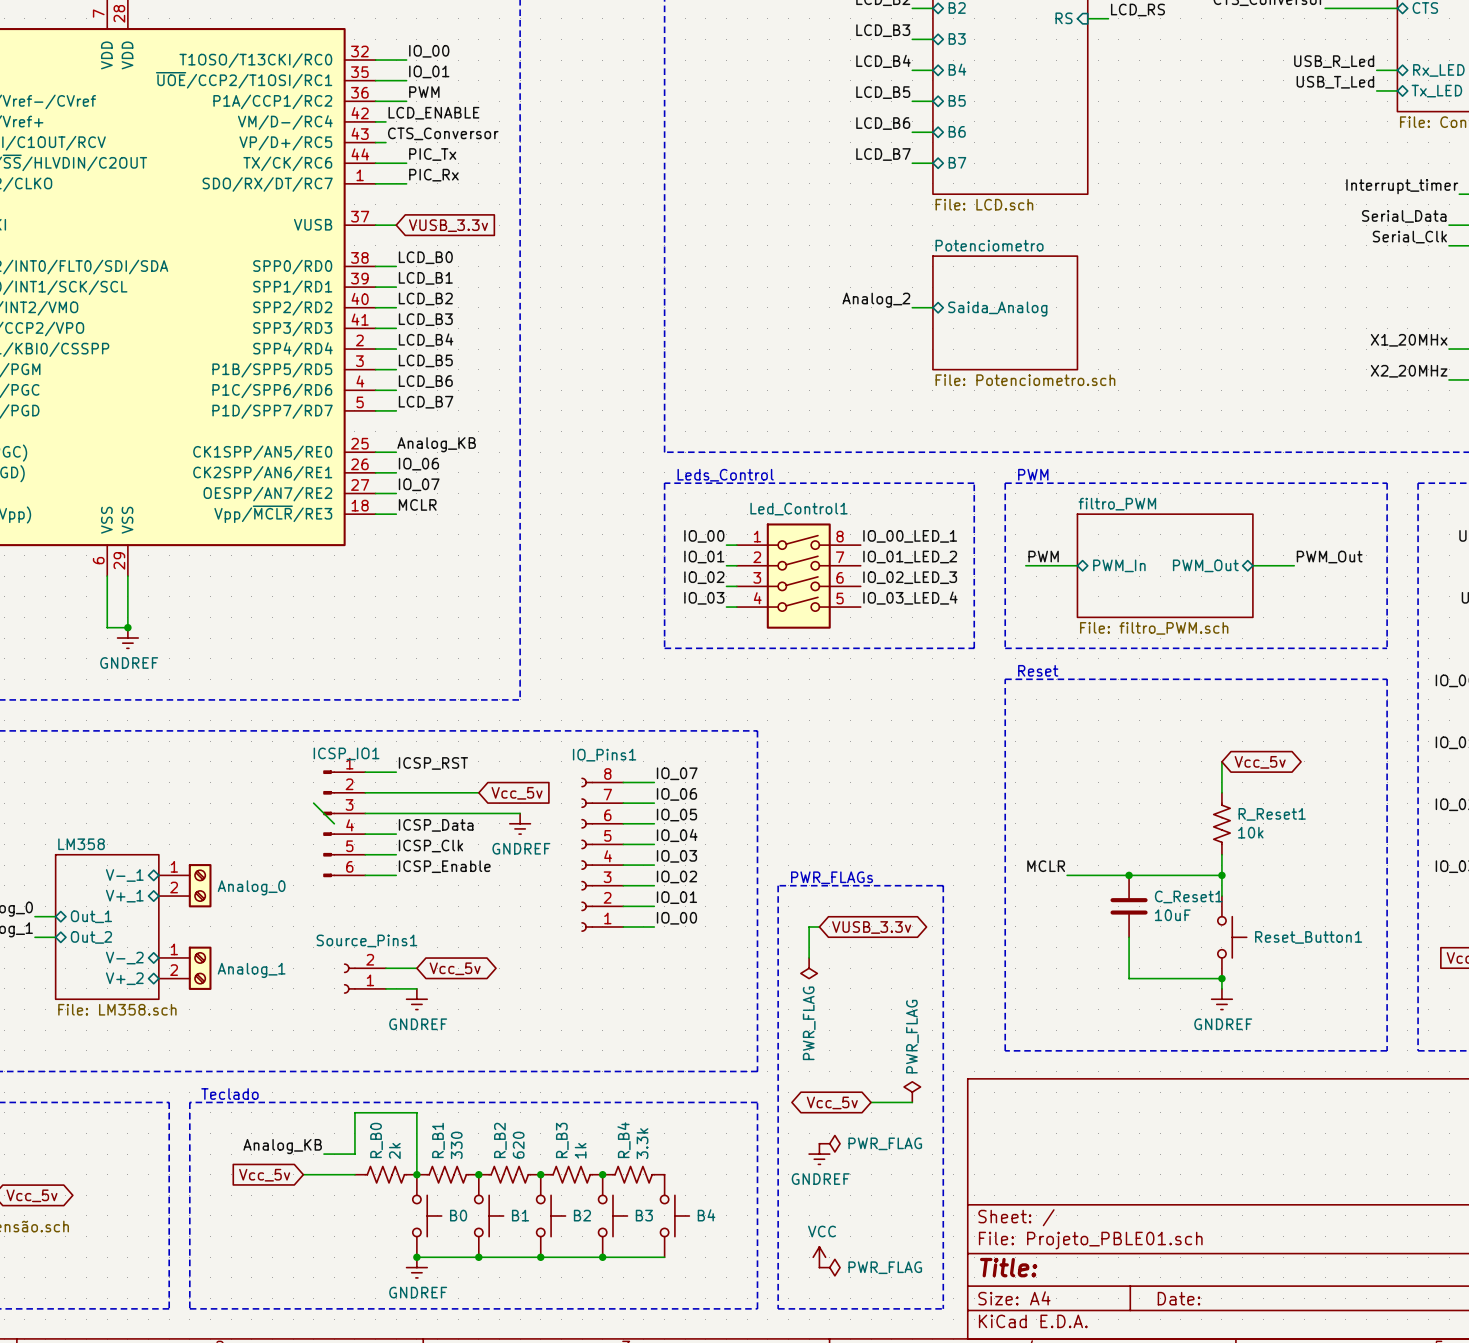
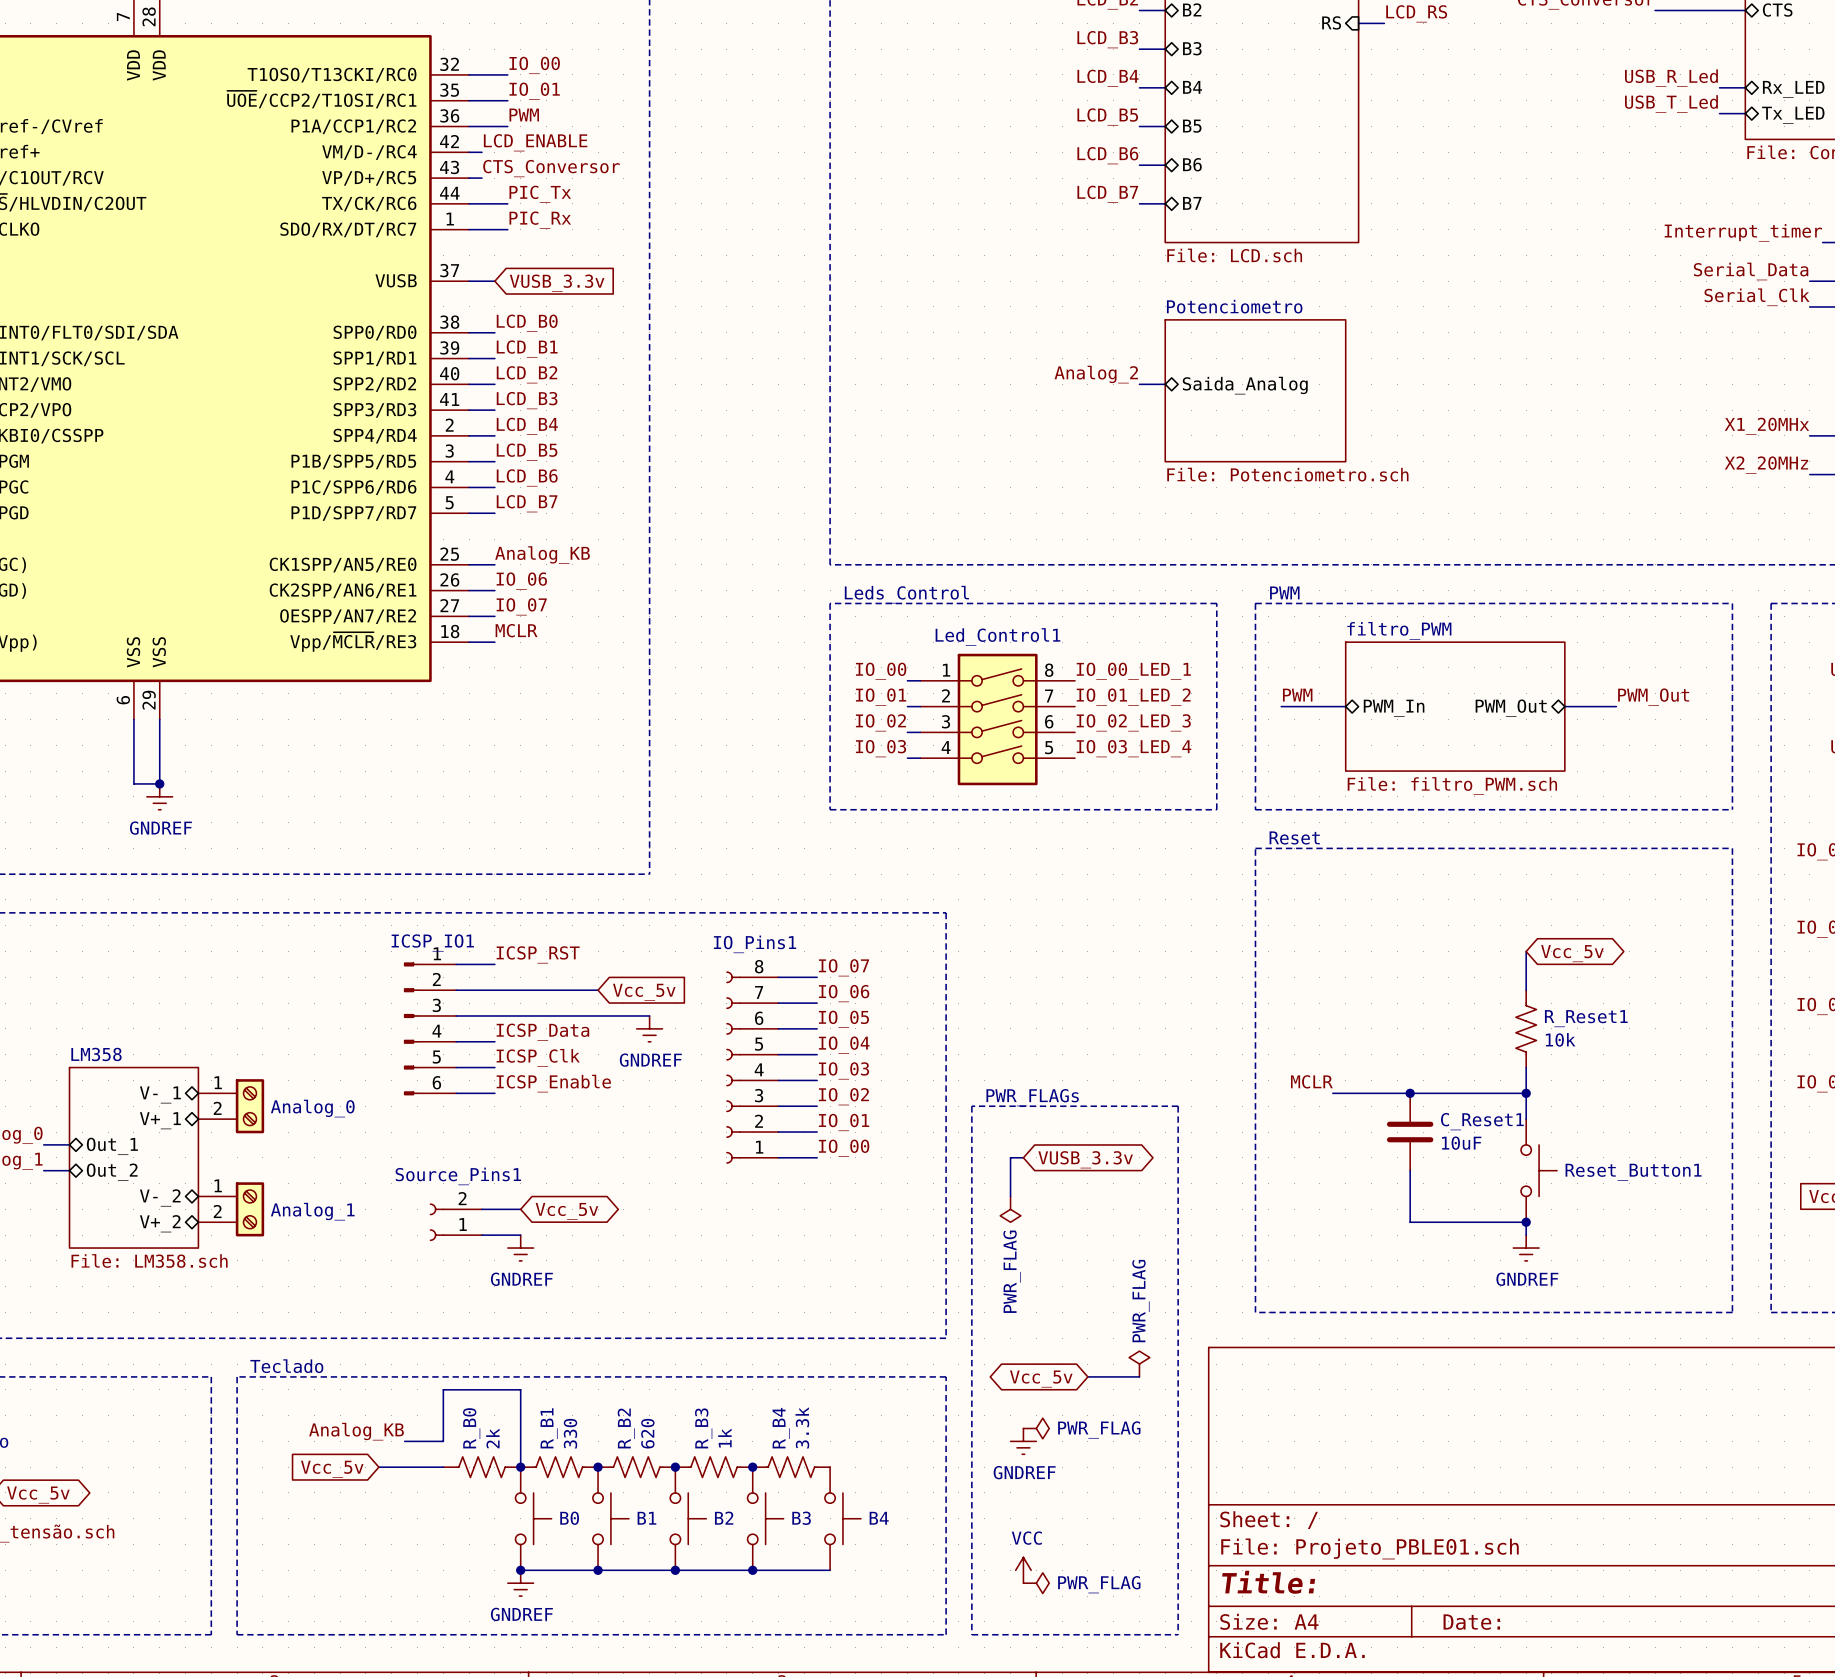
wire: (313, 803) (334, 823) -> none

